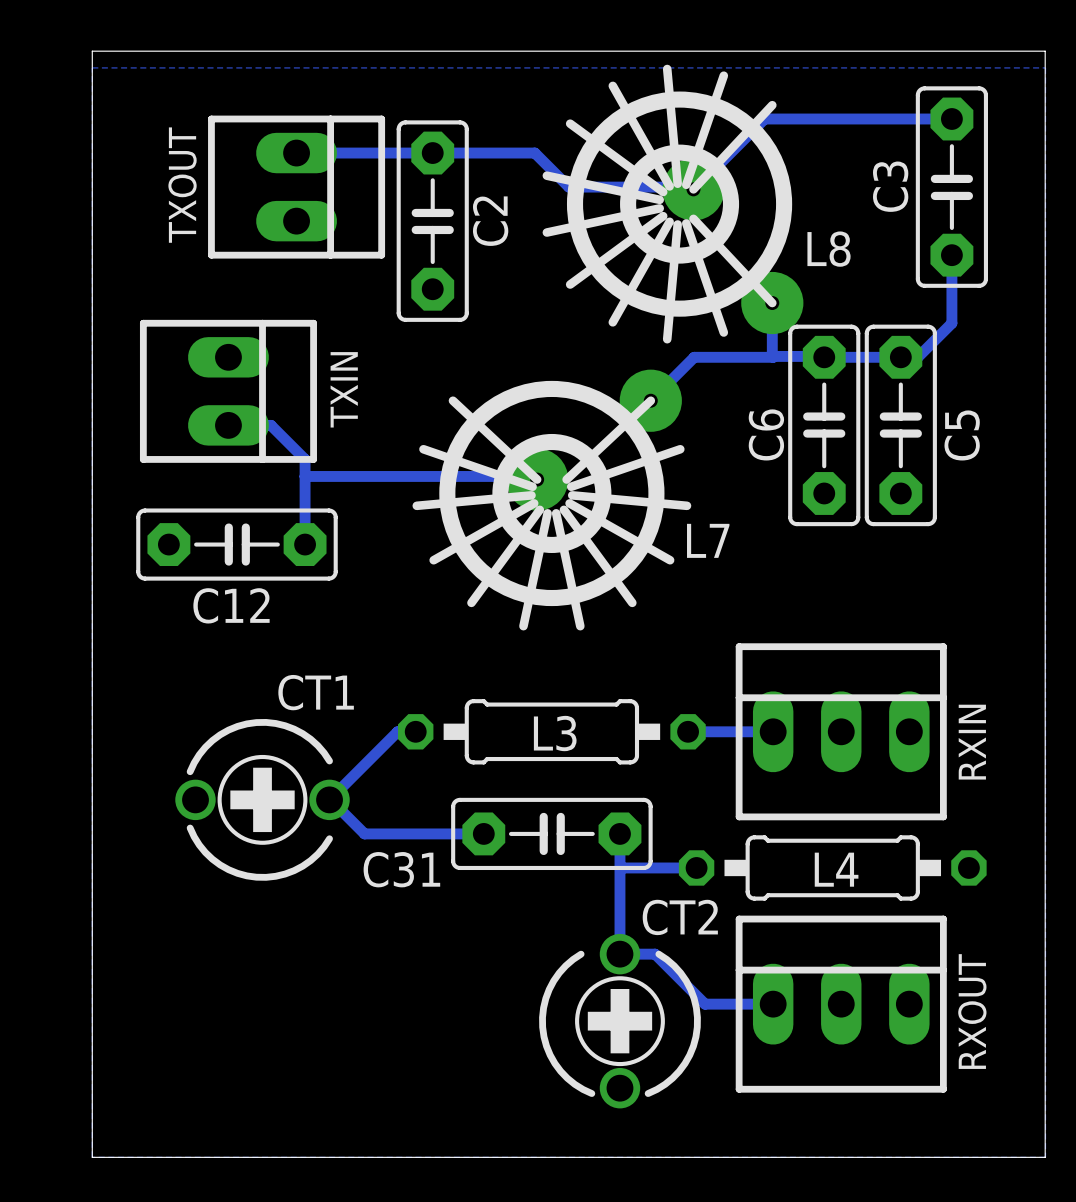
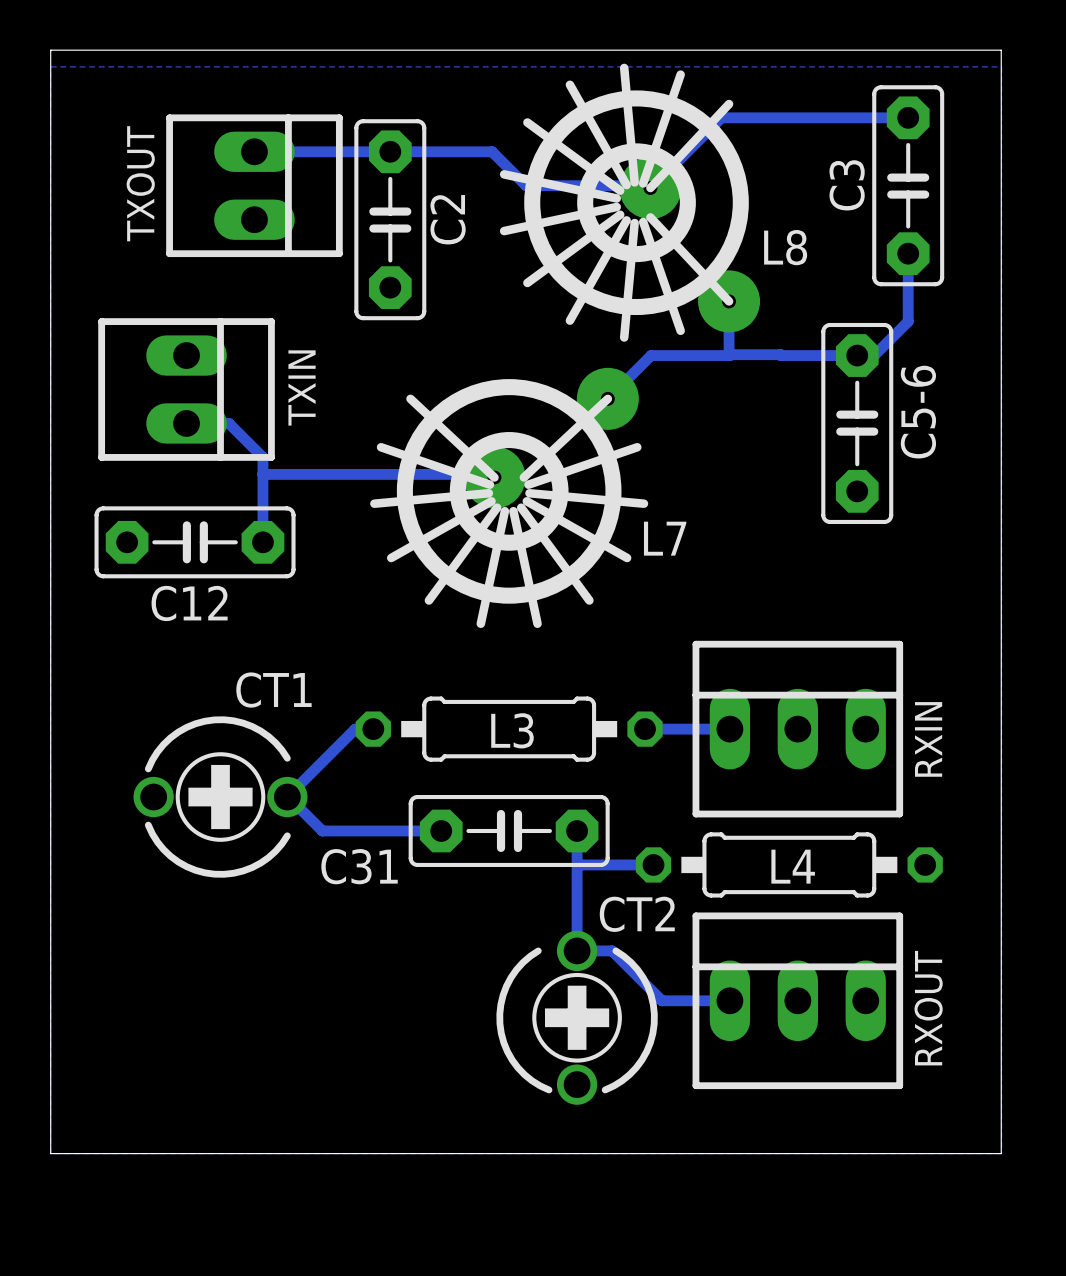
C6: (824, 425) -> none
C5 name: C5 (962, 435) -> C5-6 (918, 412)

